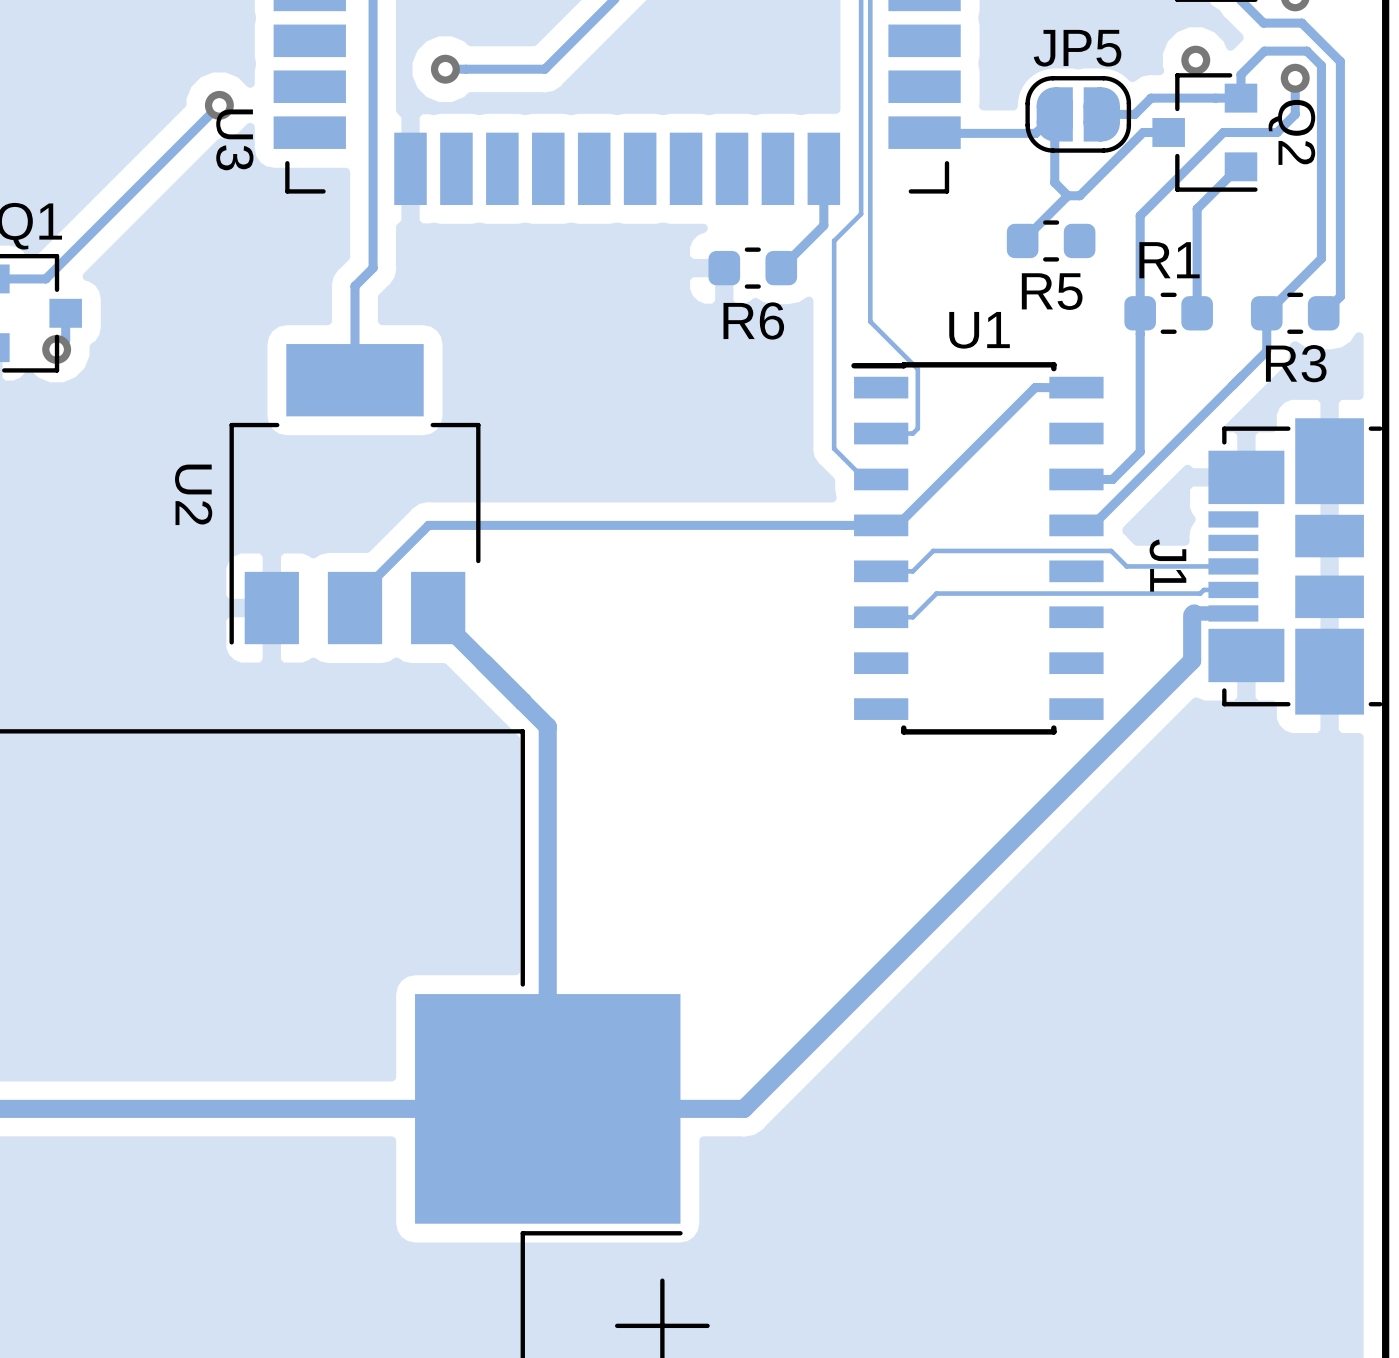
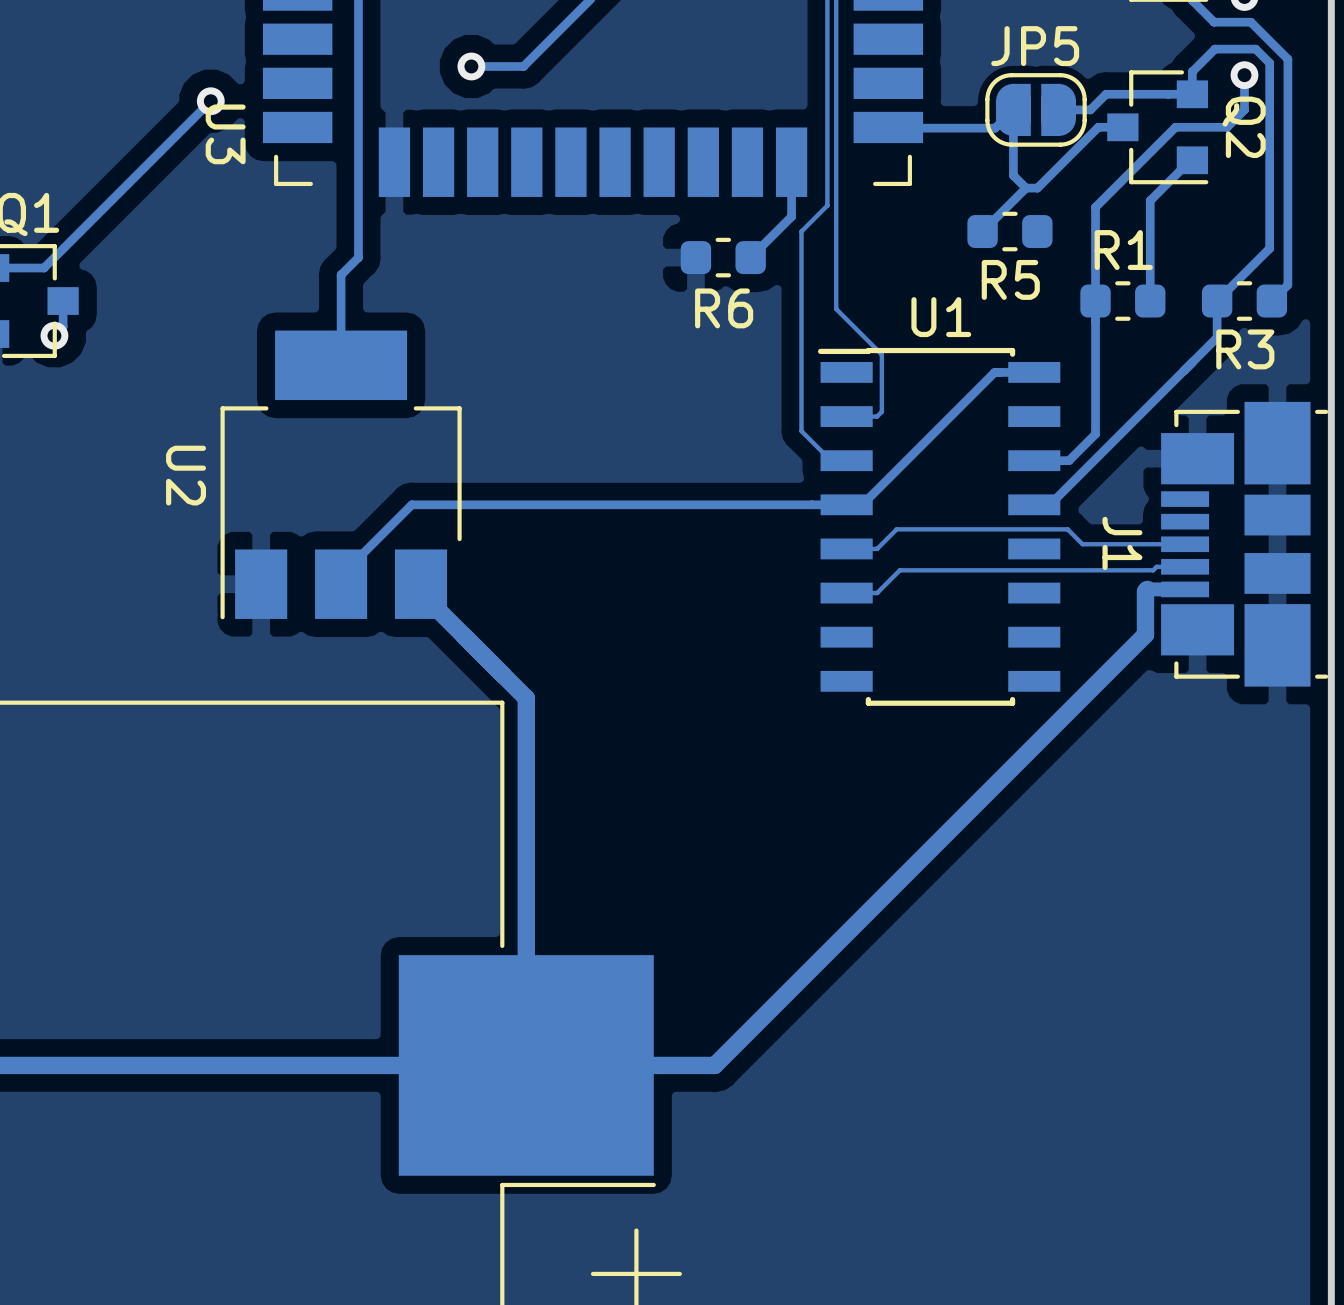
via: (1195, 60) -> none
via position: (445, 69) -> (471, 66)
track: (490, 69) (445, 69) -> none

